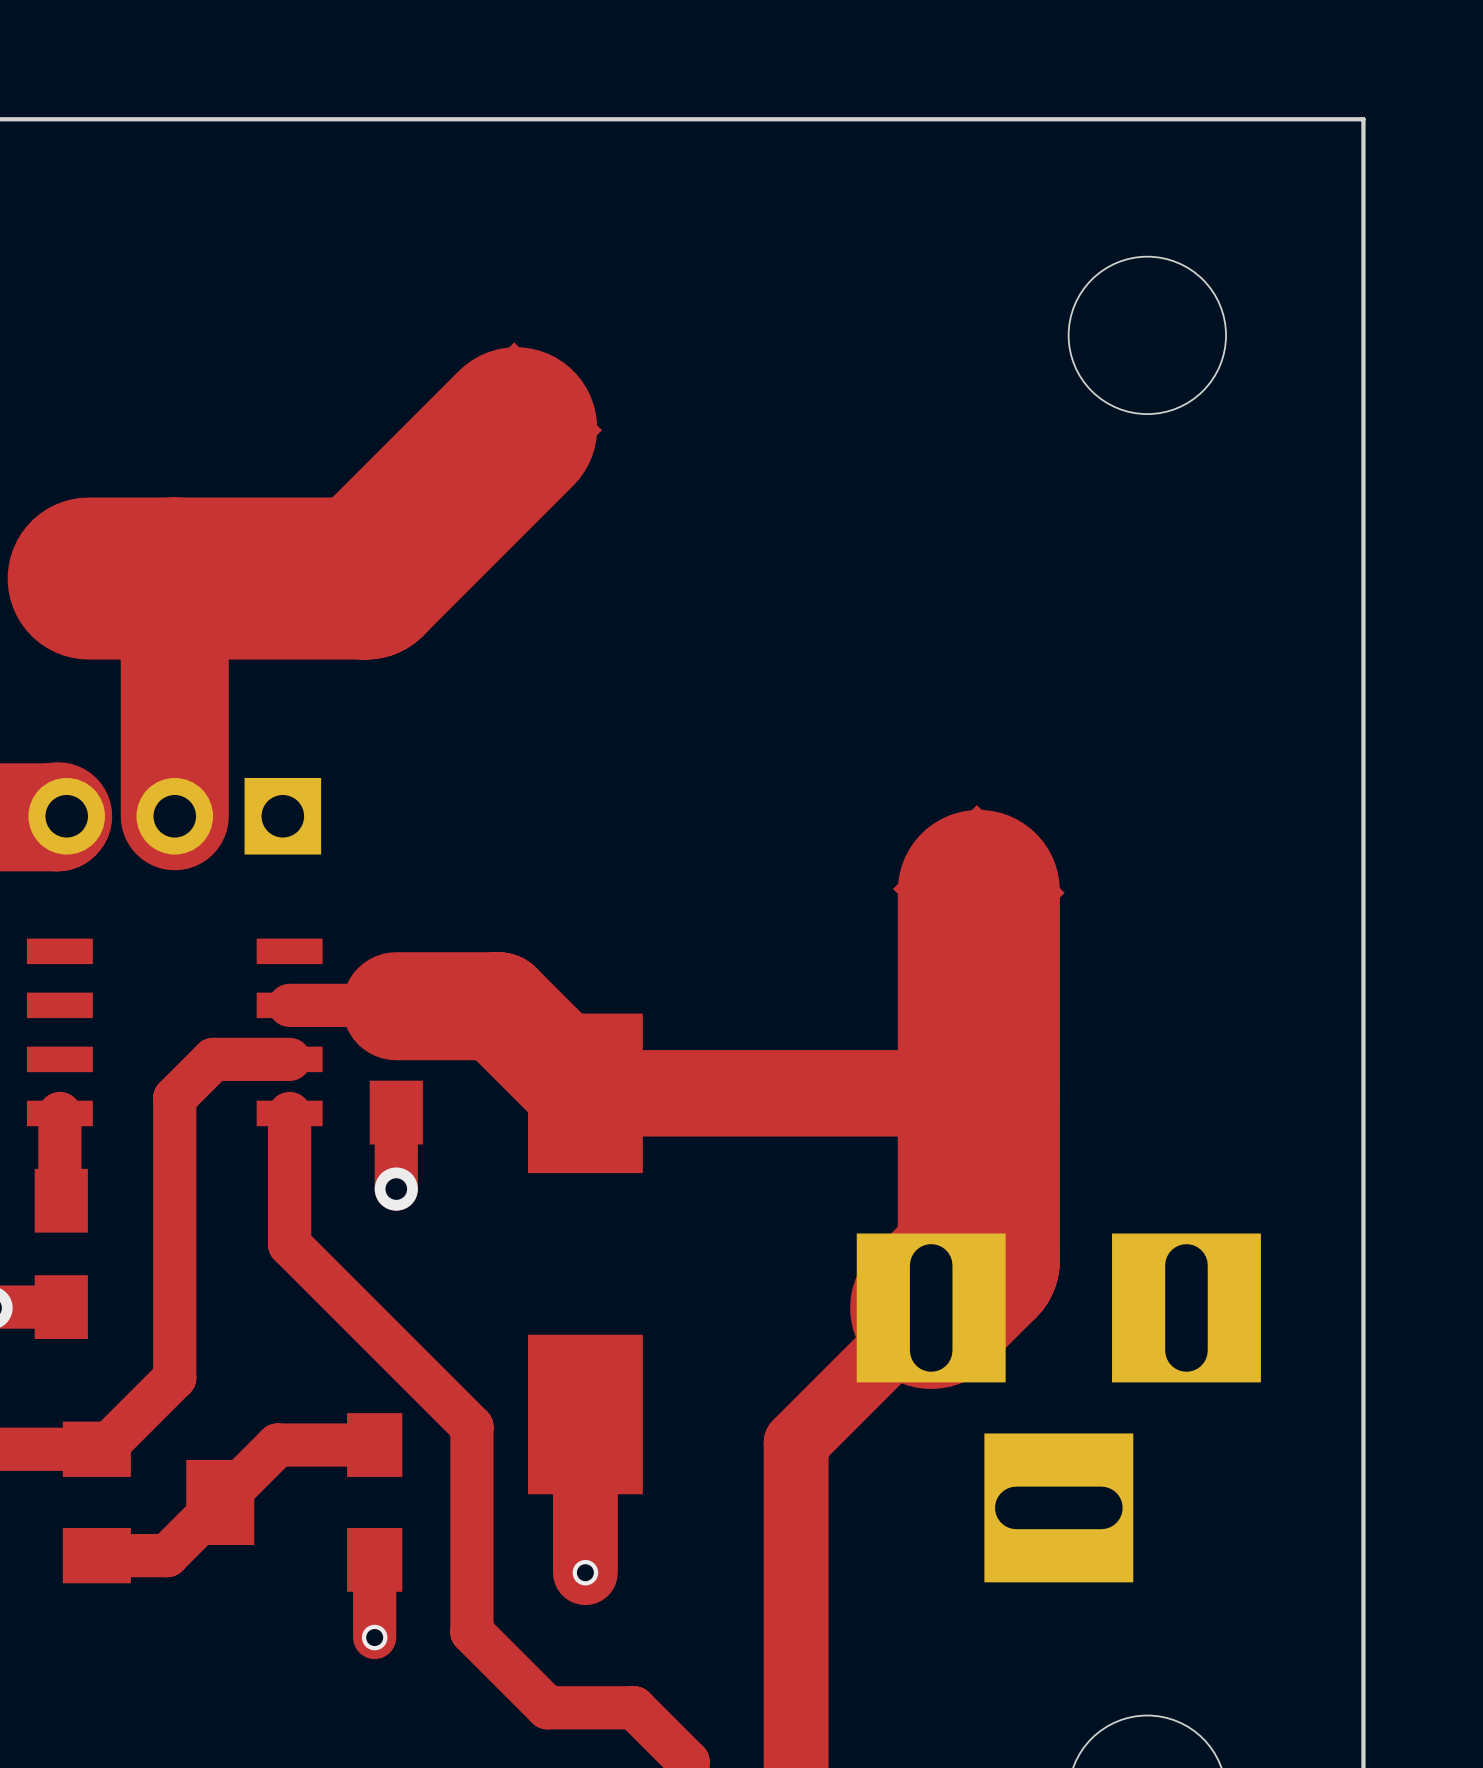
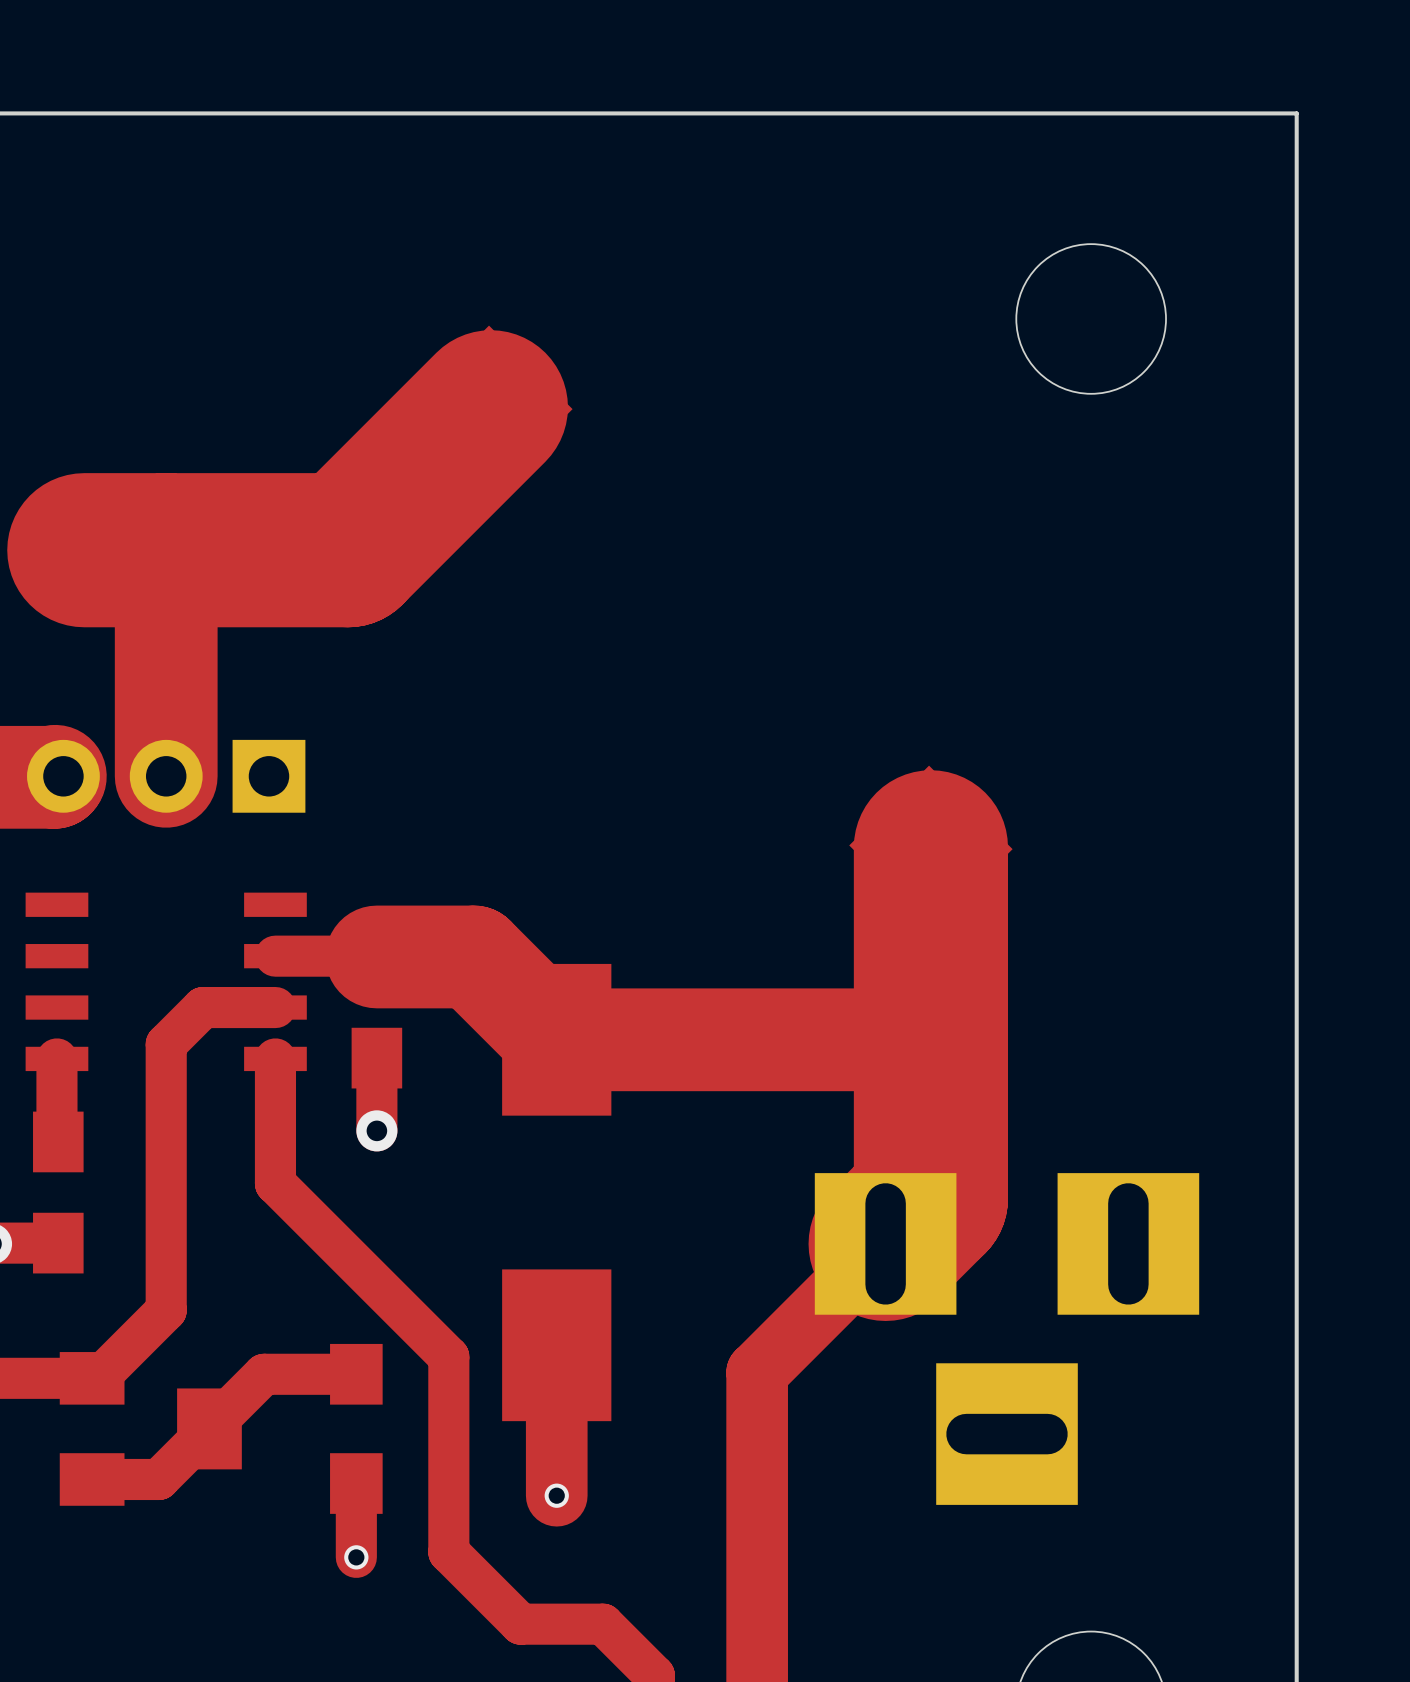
top track width: thin (977, 1093) (585, 1093) -> thick (929, 1039) (556, 1039)

